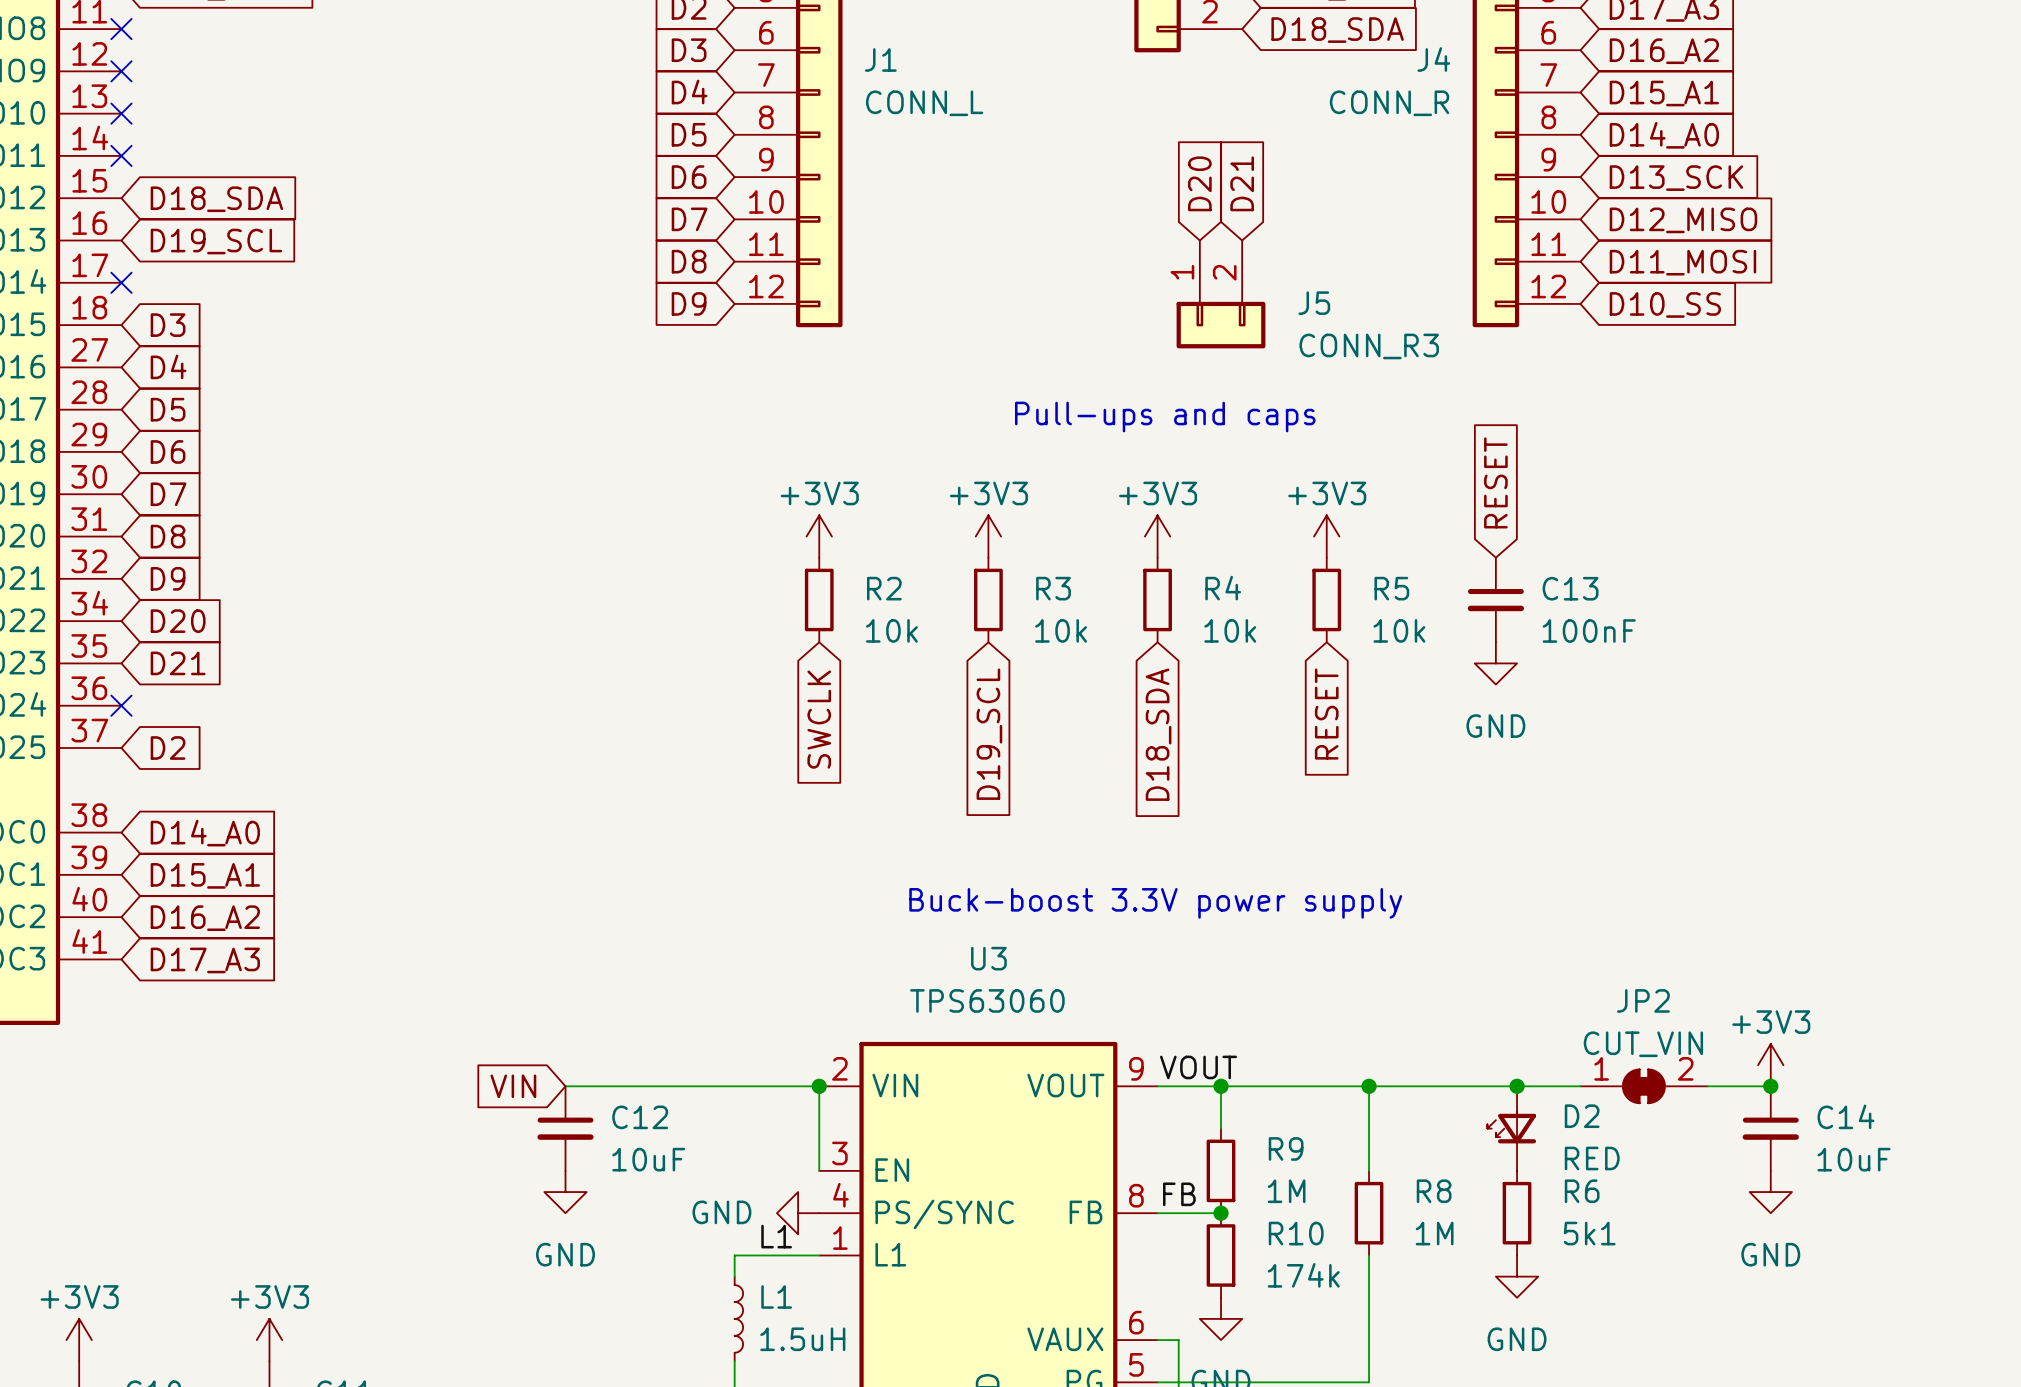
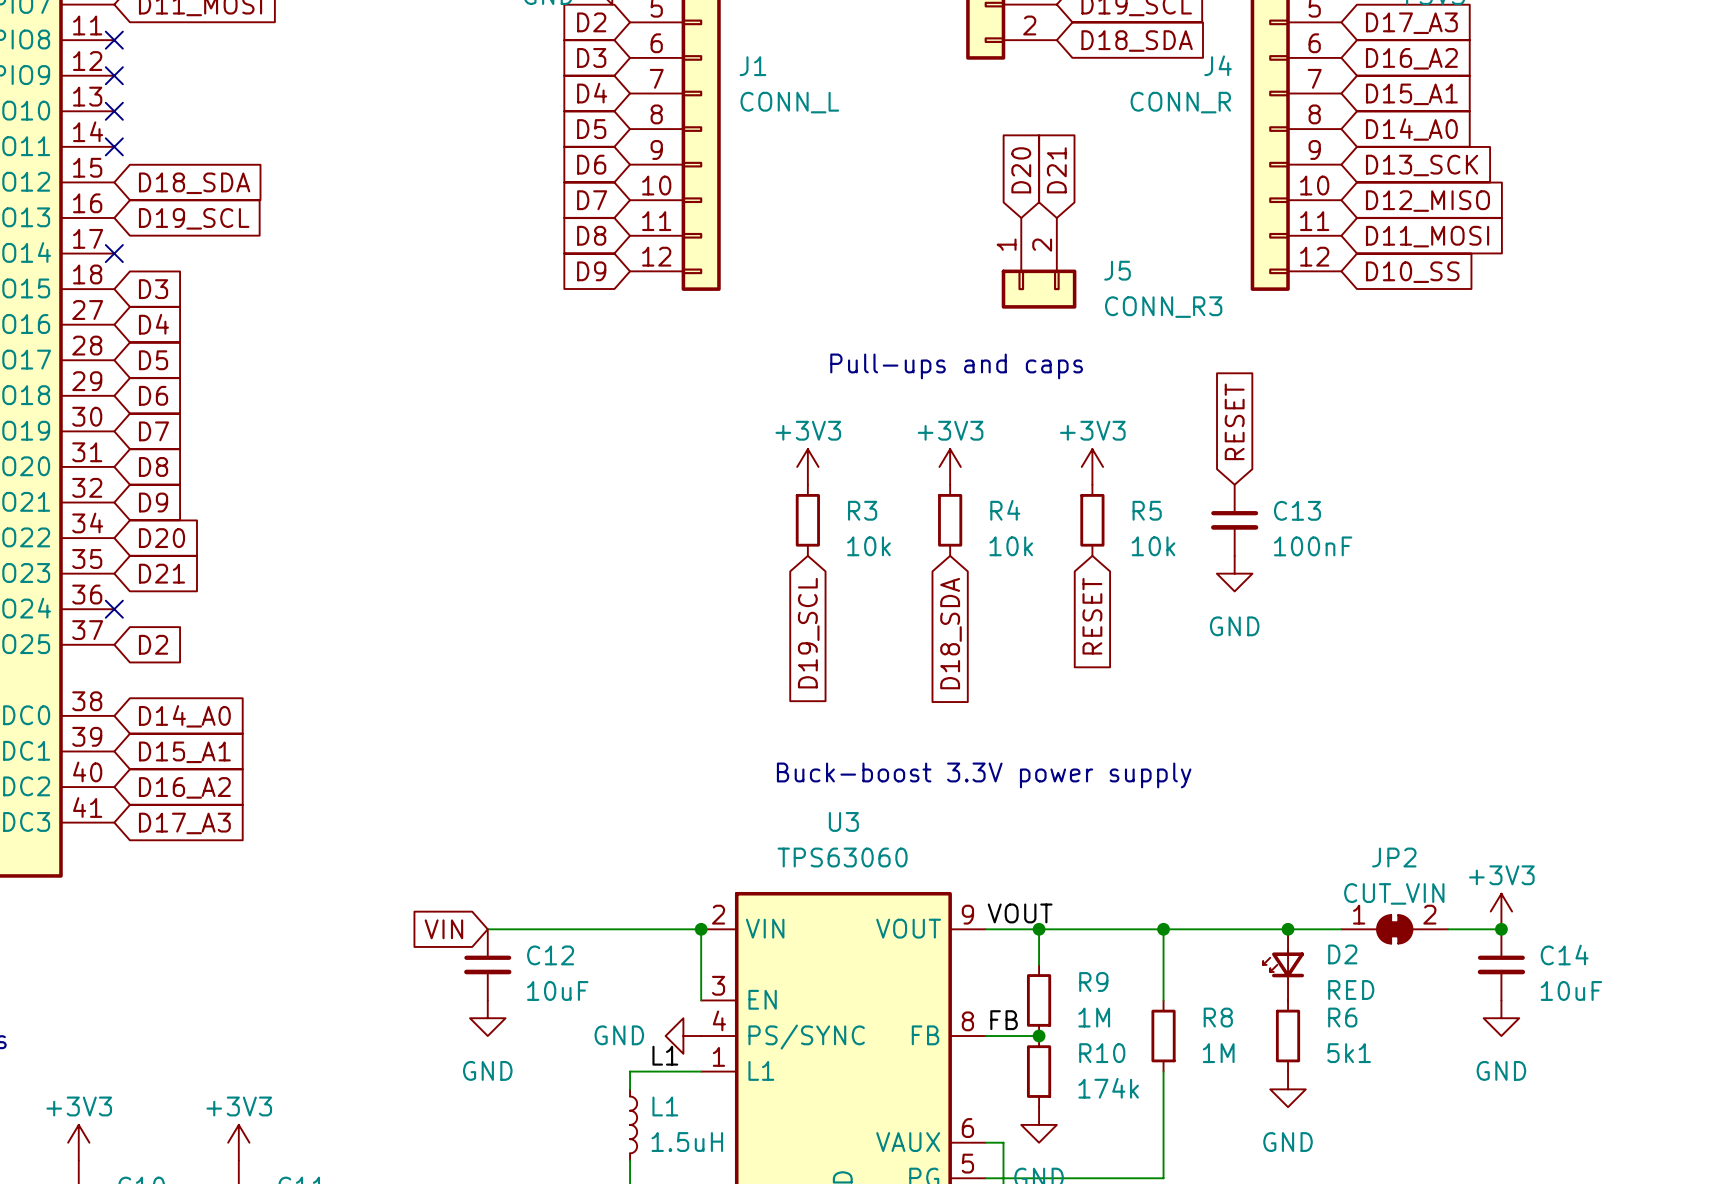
text position: Pull-ups and caps (1165, 417) -> Pull-ups and caps (956, 366)
global label position: RESET (1495, 482) -> RESET (1234, 421)
power symbol: +3V3 (819, 536) -> none
power symbol position: +3V3 (988, 536) -> +3V3 (807, 466)
power symbol position: +3V3 (1157, 536) -> +3V3 (950, 466)
power symbol position: +3V3 (1326, 536) -> +3V3 (1092, 466)
R2: 10k (819, 599) -> none
R3 position: (988, 599) -> (807, 520)
R4 position: (1157, 599) -> (950, 520)
R5 position: (1326, 599) -> (1092, 520)
C13 position: (1495, 599) -> (1234, 520)
power symbol position: GND (1495, 663) -> GND (1234, 573)
global label position: RESET (1326, 714) -> RESET (1092, 616)
global label: SWCLK (819, 719) -> none
global label position: D19_SCL (989, 734) -> D19_SCL (808, 633)
global label position: D18_SDA (1158, 734) -> D18_SDA (950, 633)

